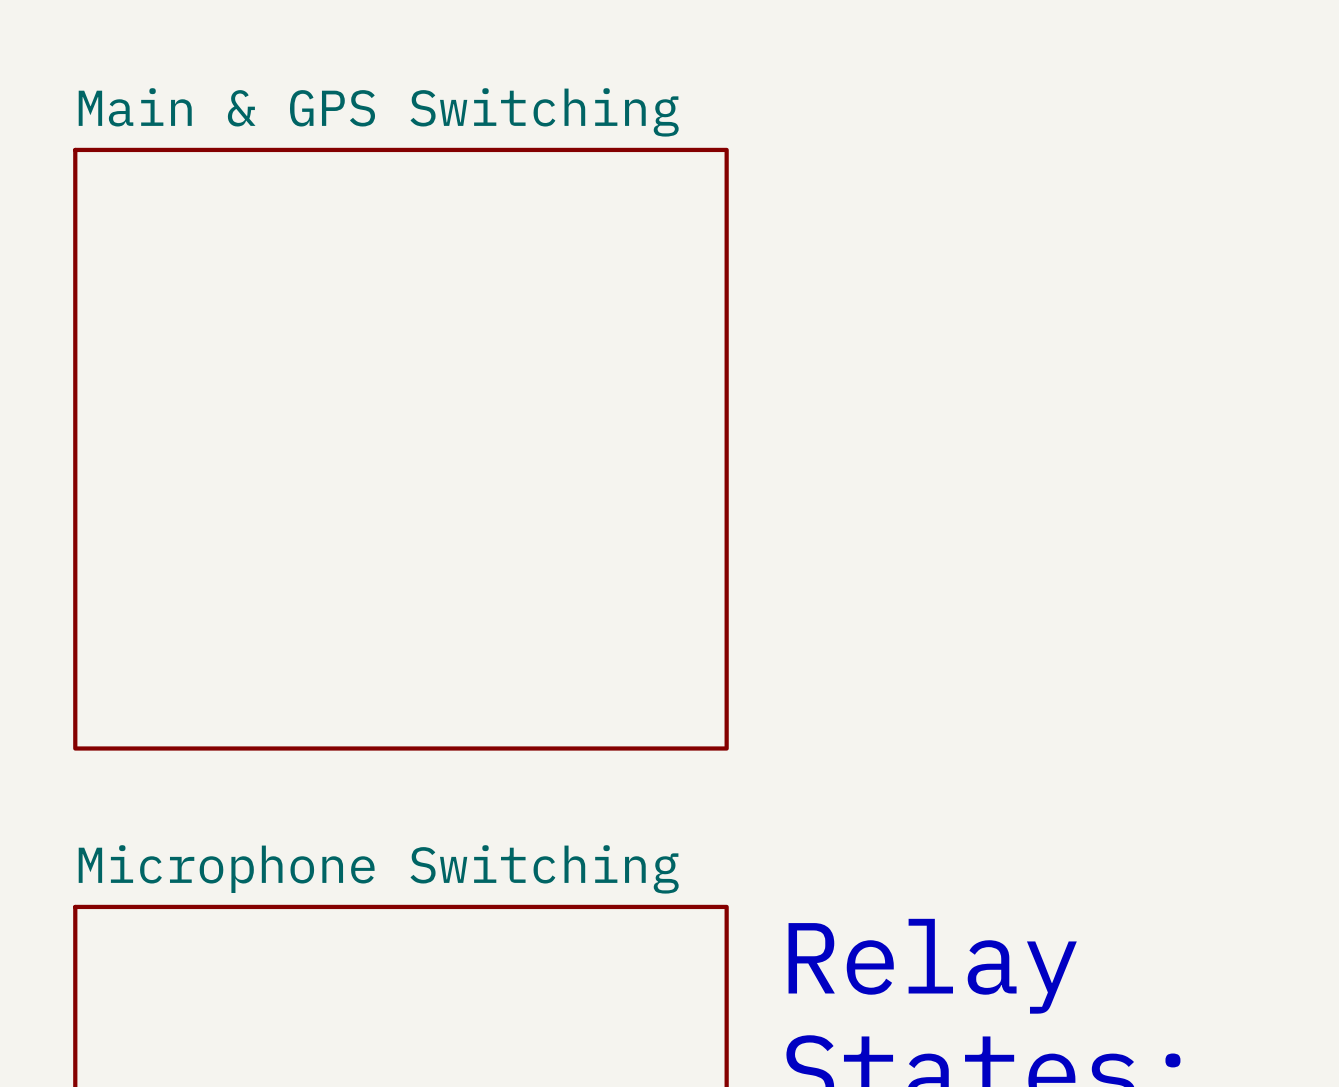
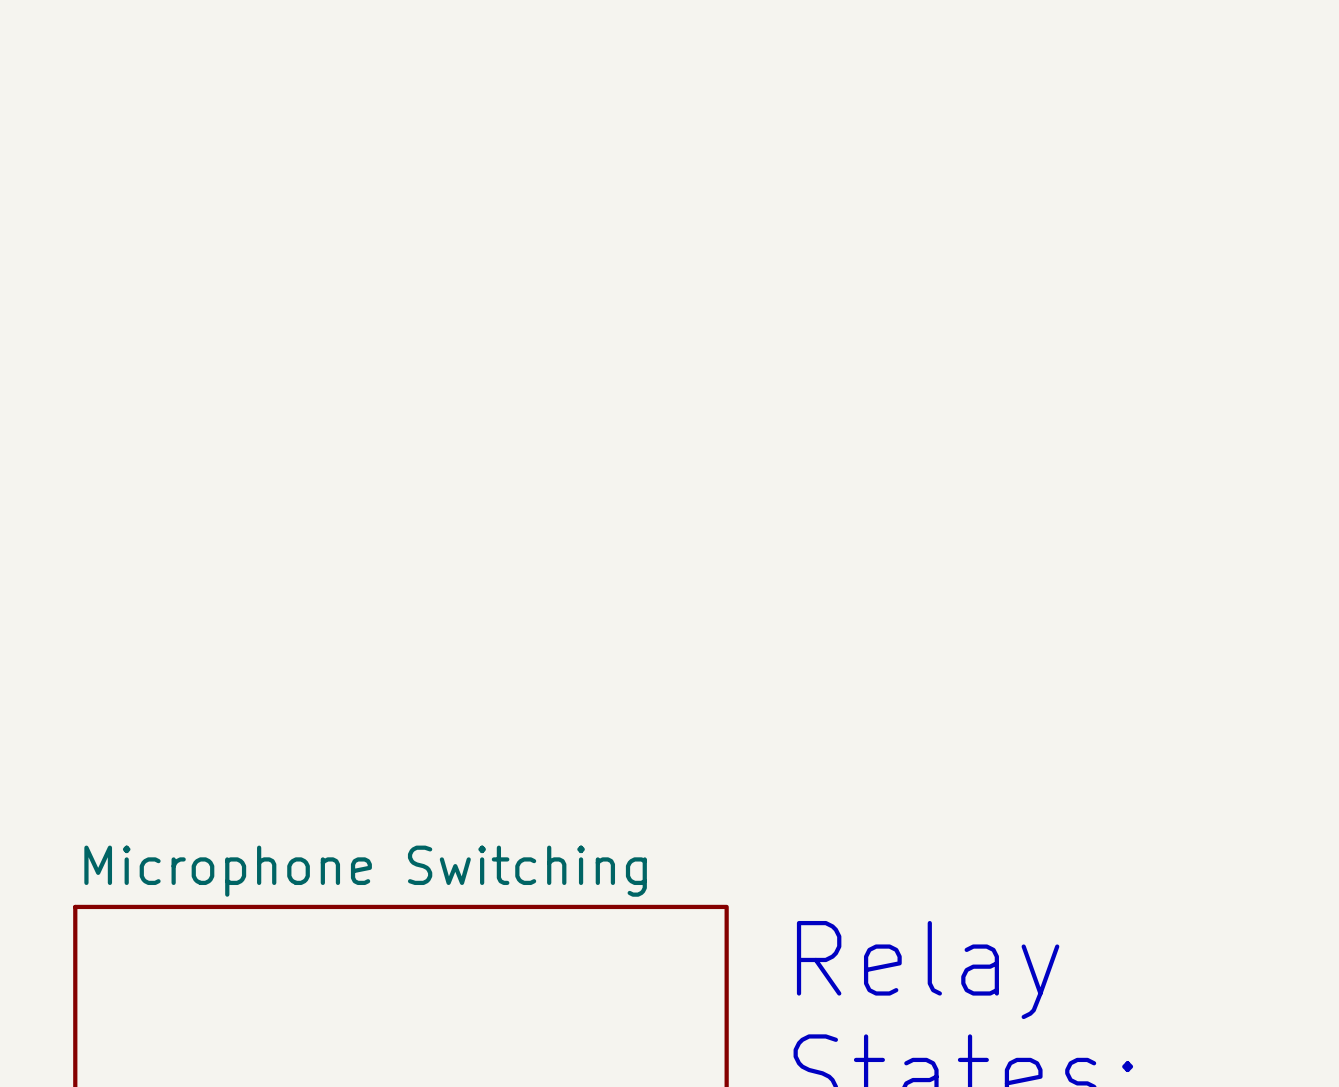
sheet Main & GPS Switching: (400, 449) -> none

